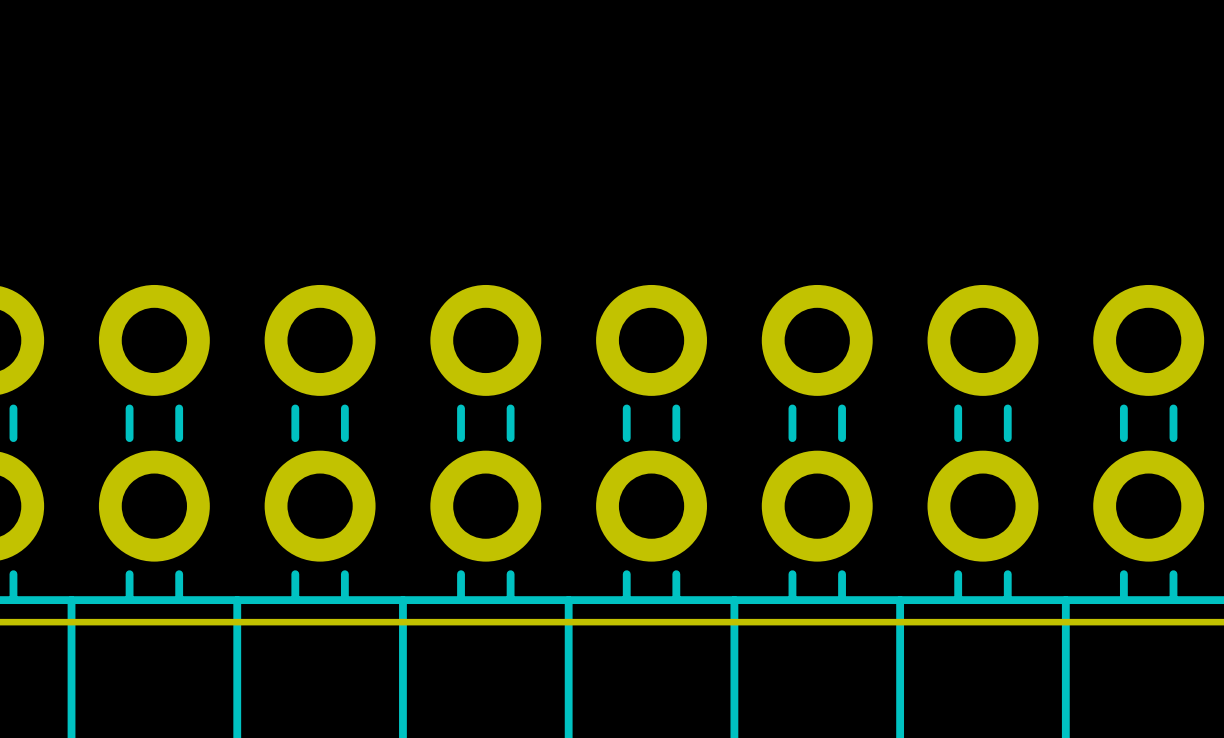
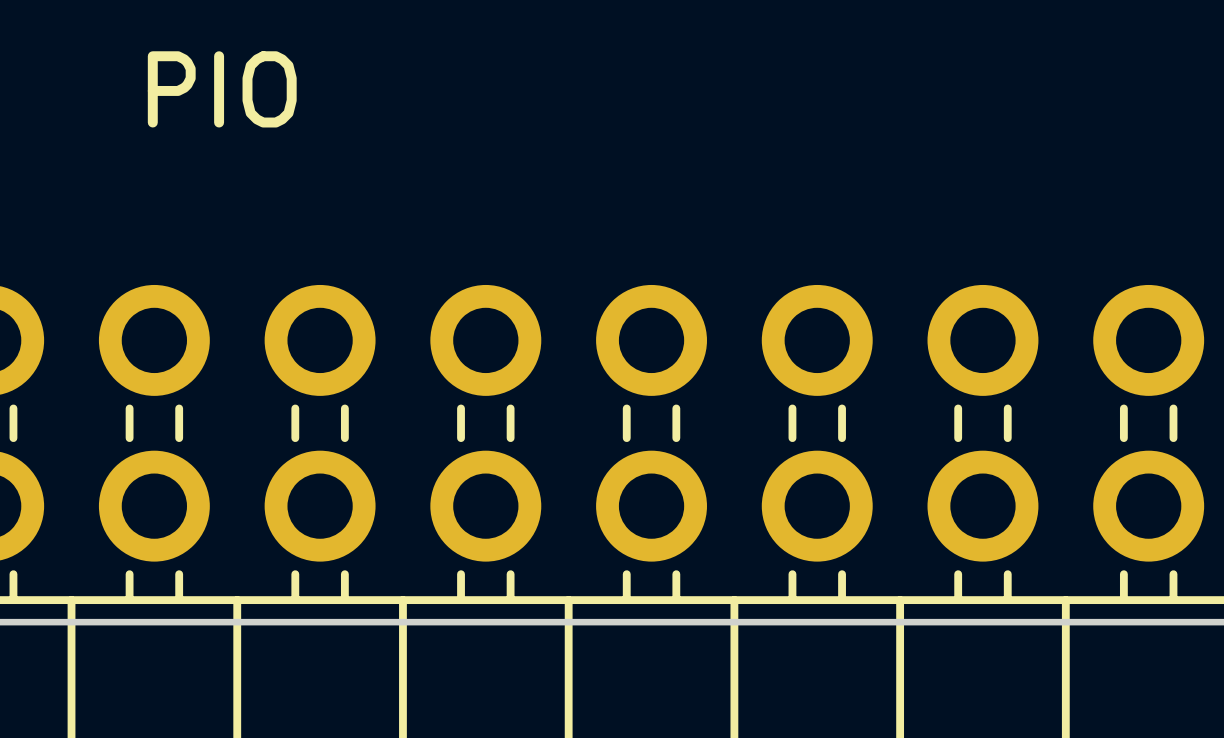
text: none -> PIO (222, 89)

